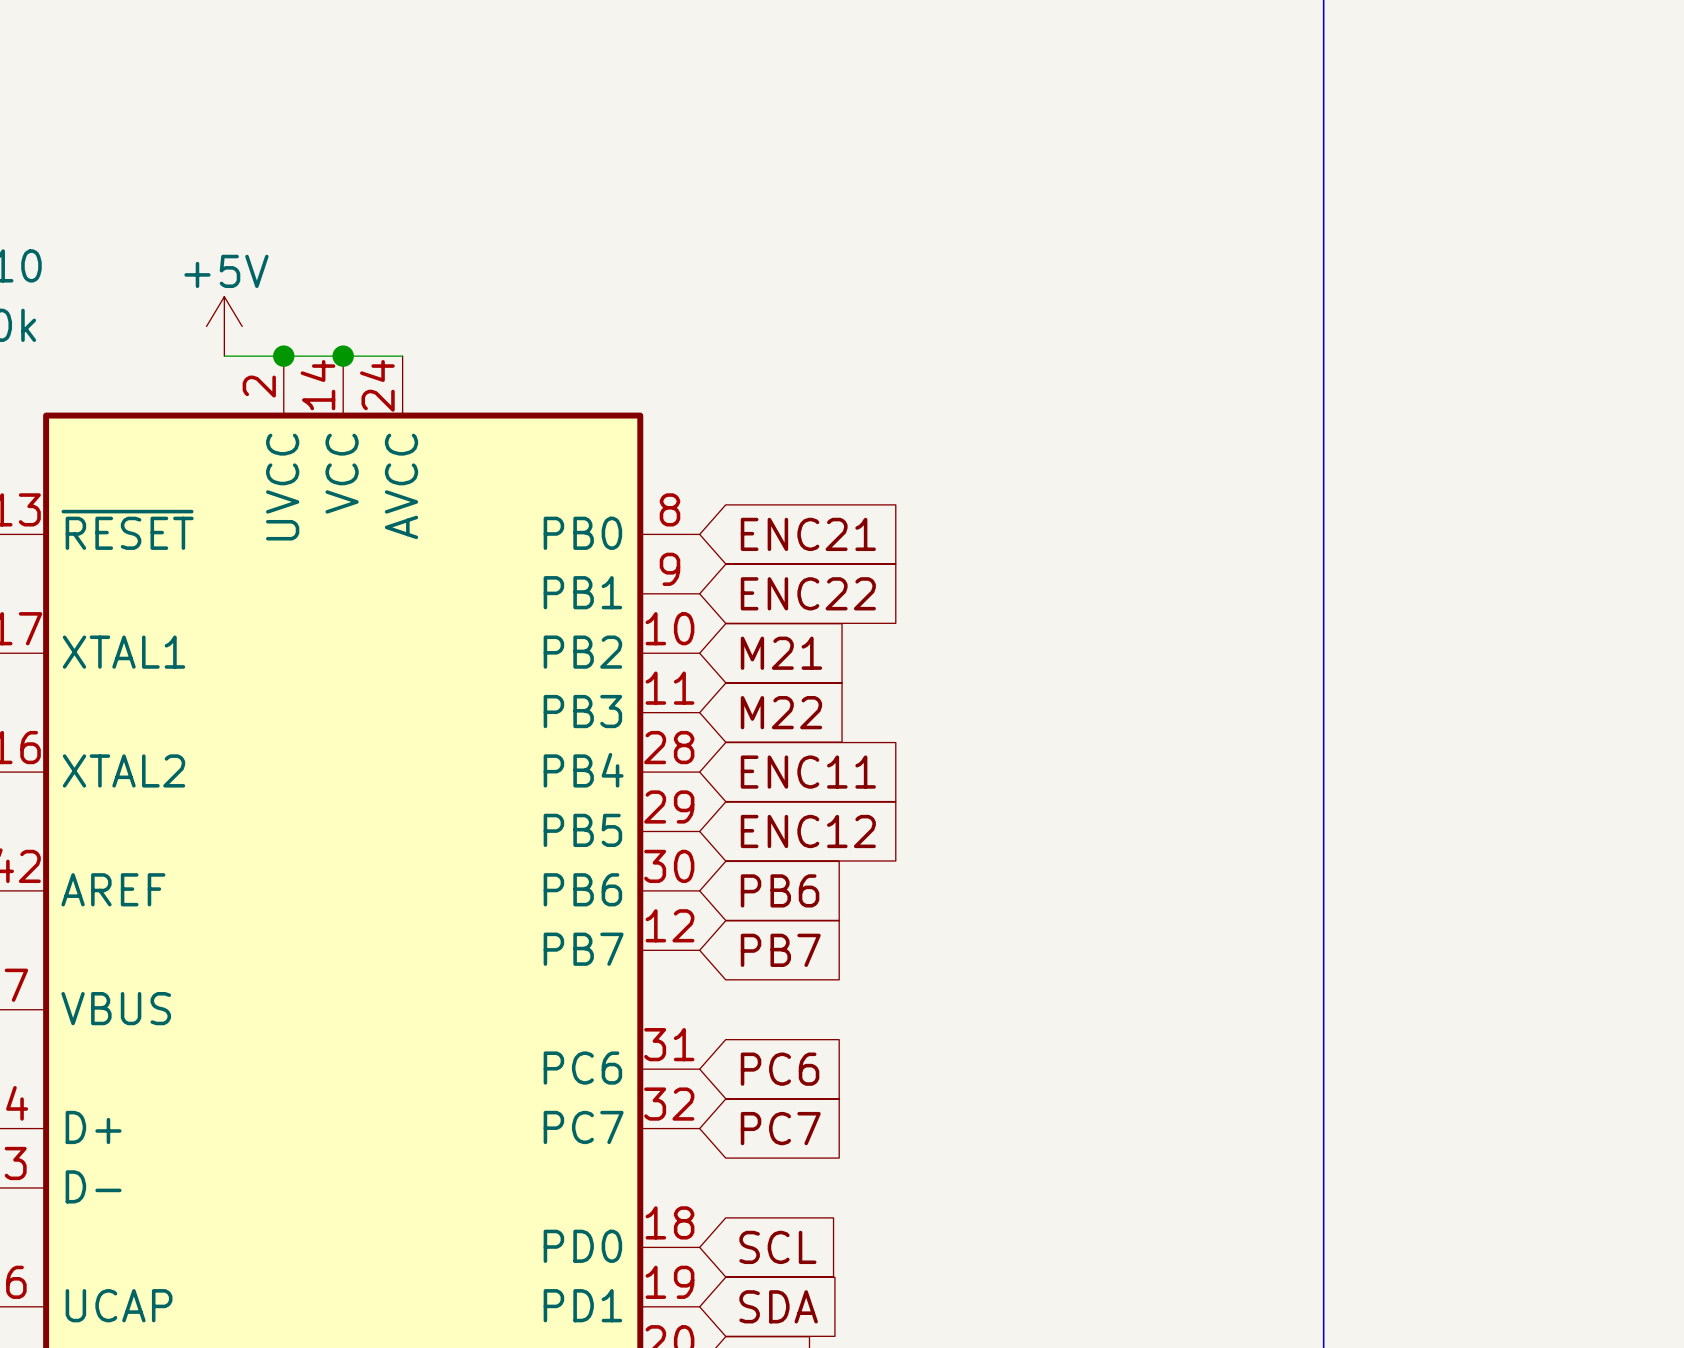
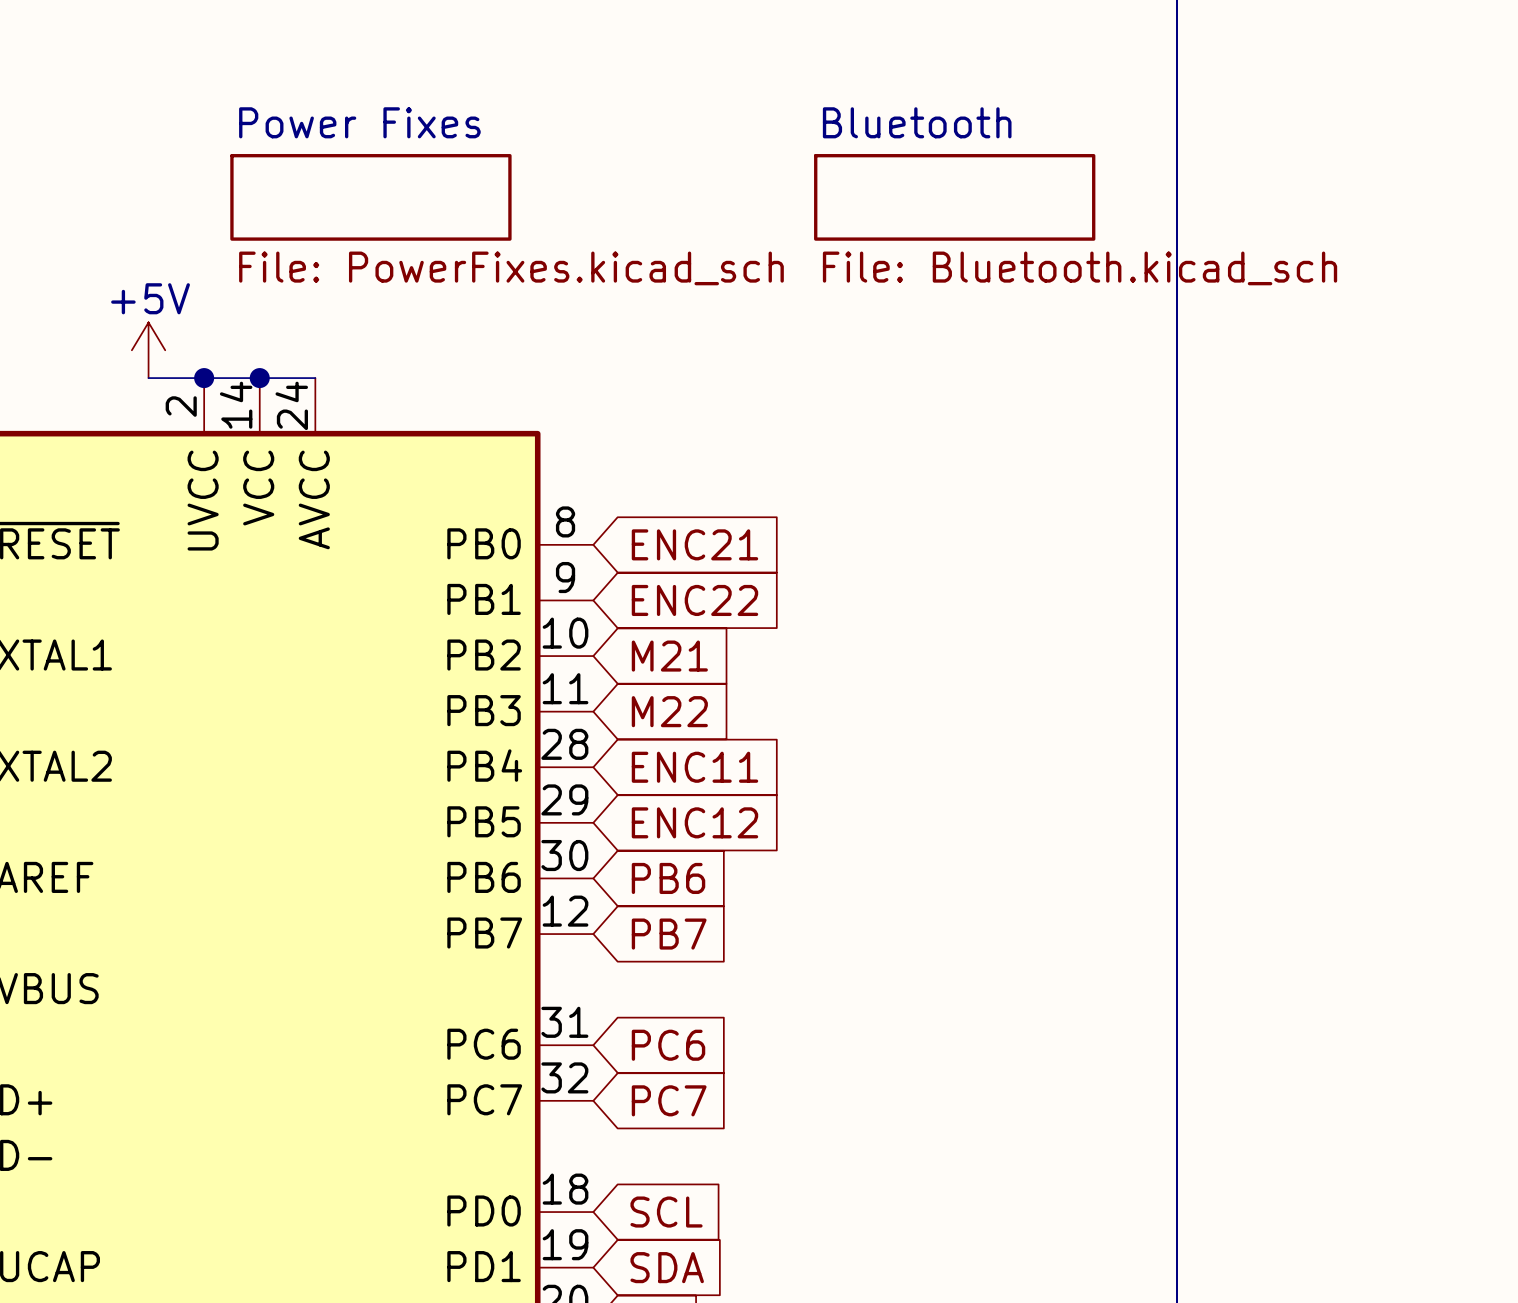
sheet Power Fixes: none -> File: PowerFixes.kicad_sch (370, 197)
sheet Bluetooth: none -> File: Bluetooth.kicad_sch (954, 197)

